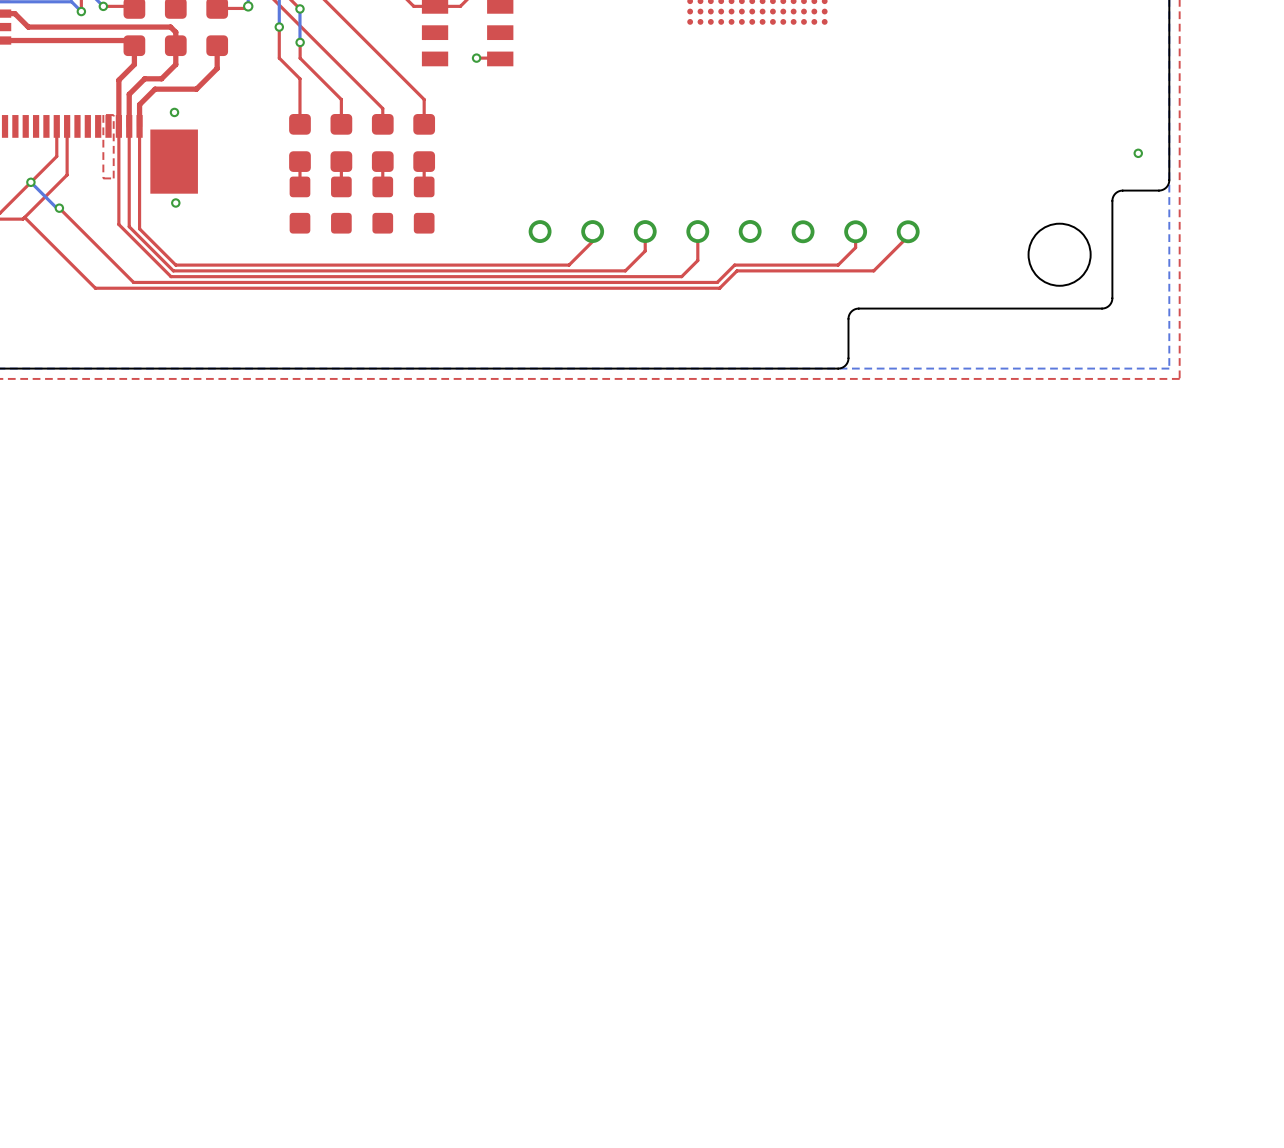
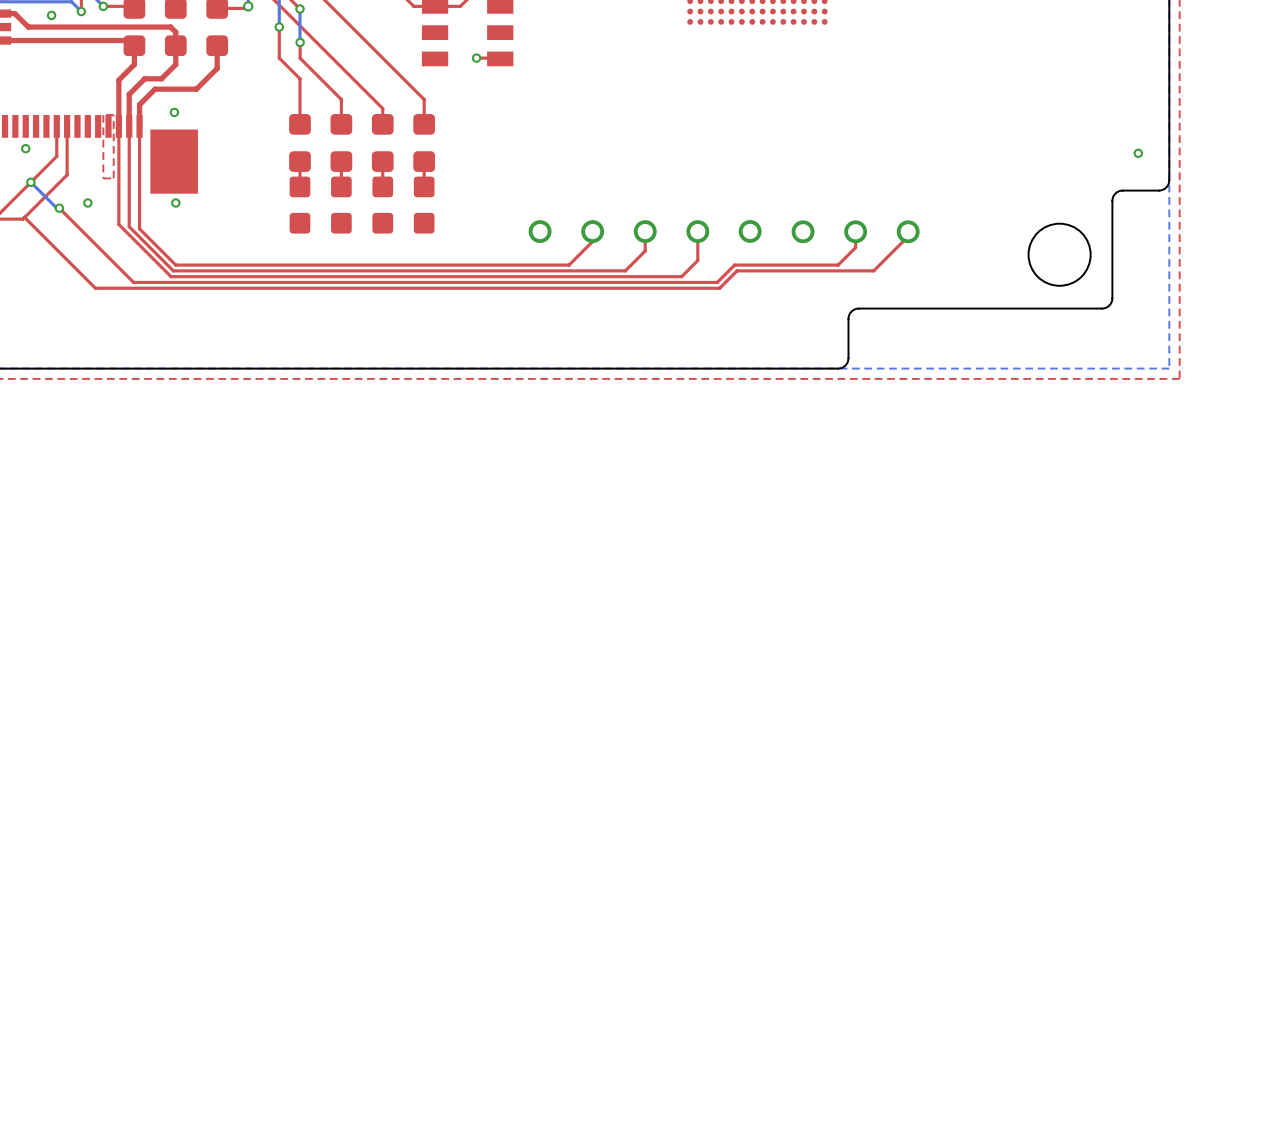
via: none -> (51, 15)
via: none -> (25, 148)
via: none -> (87, 203)

